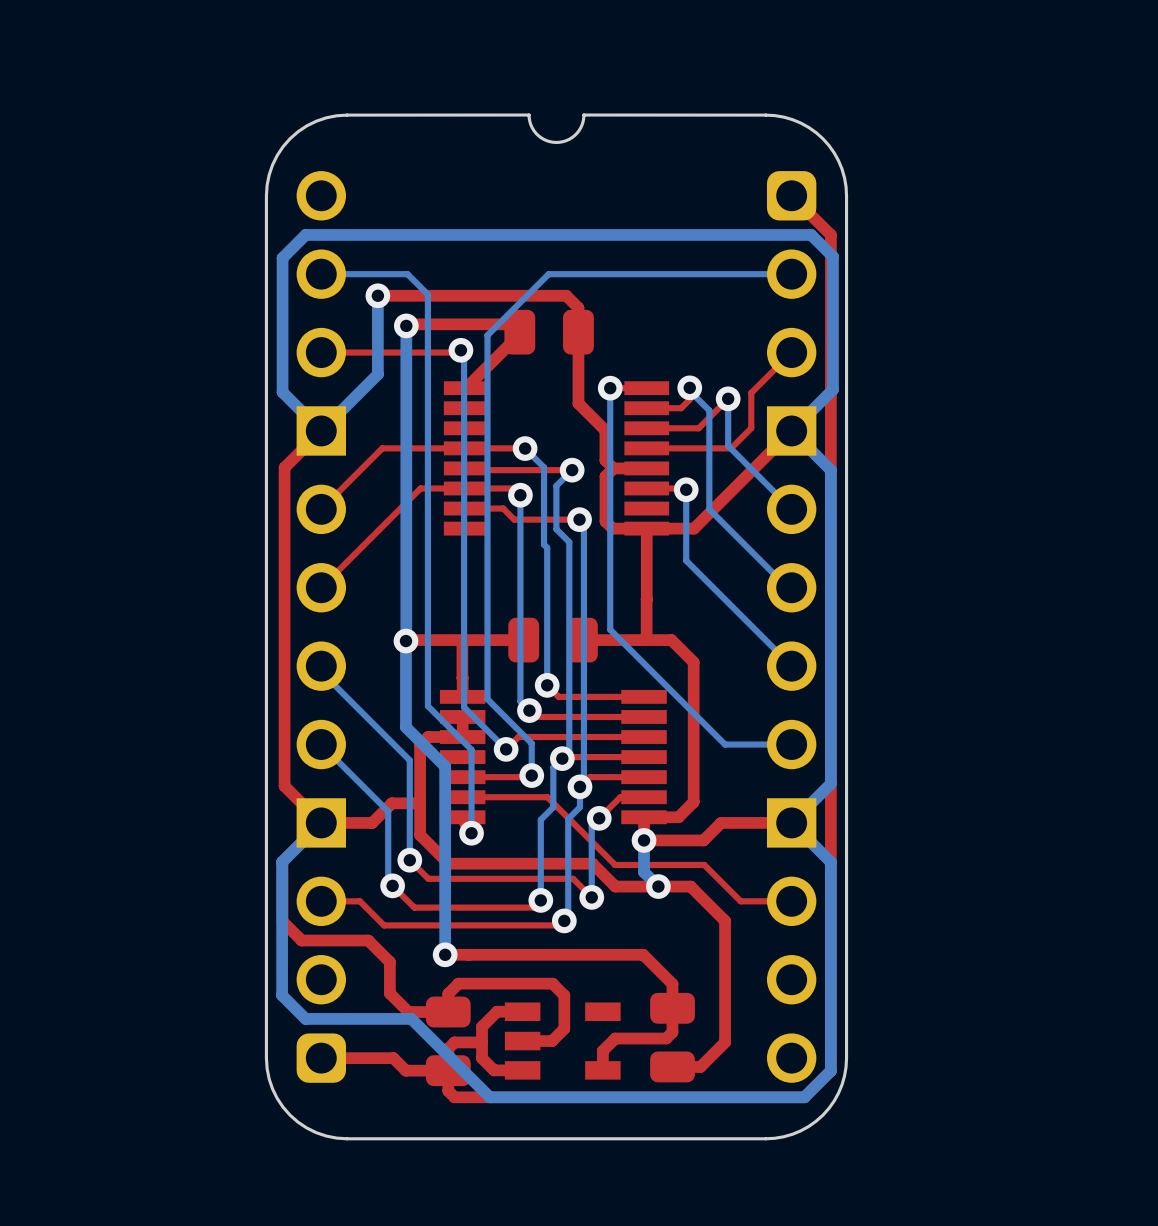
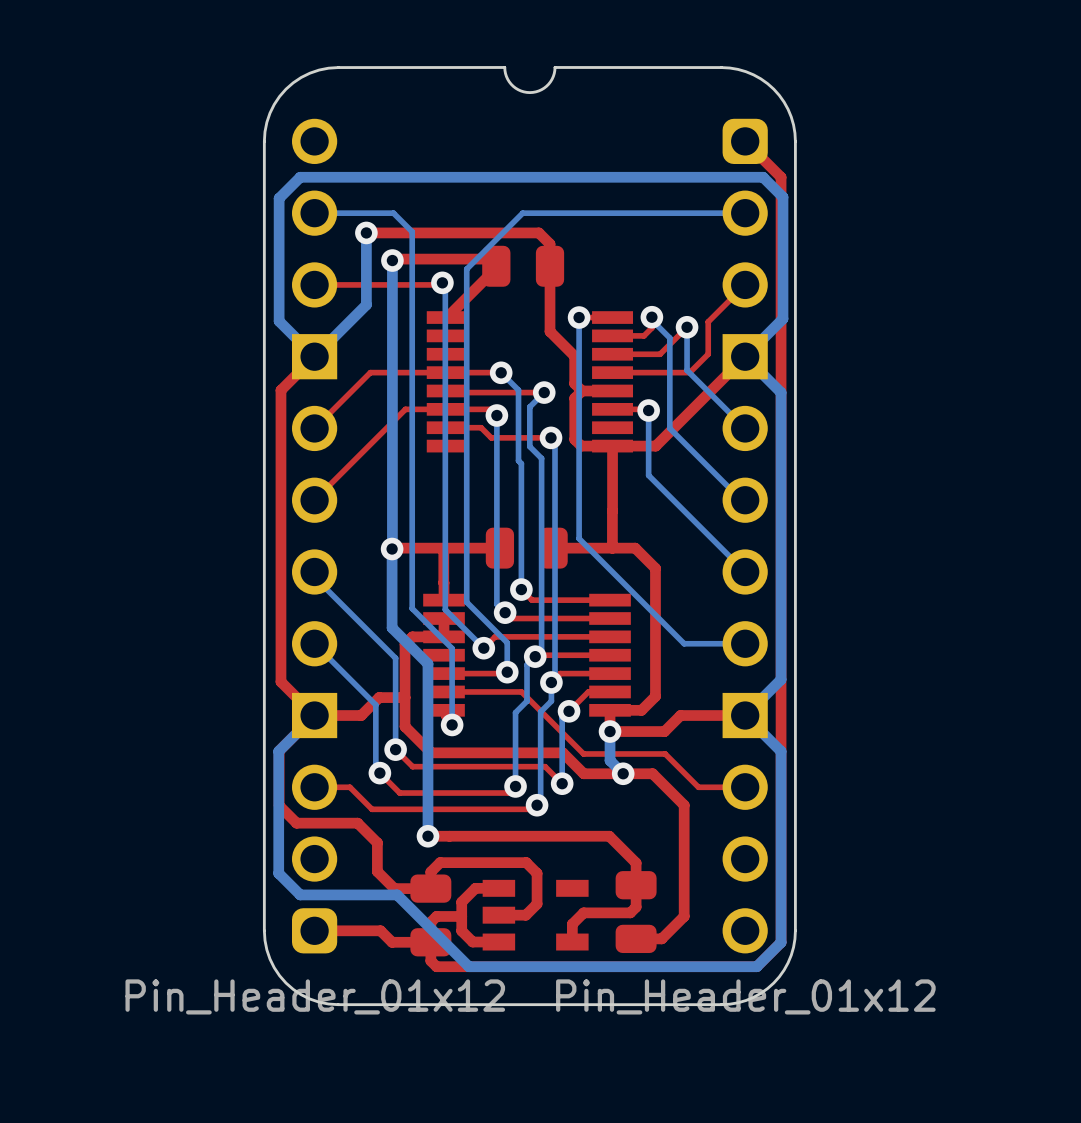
drawing: none -> [125, 979, 936, 1015]

